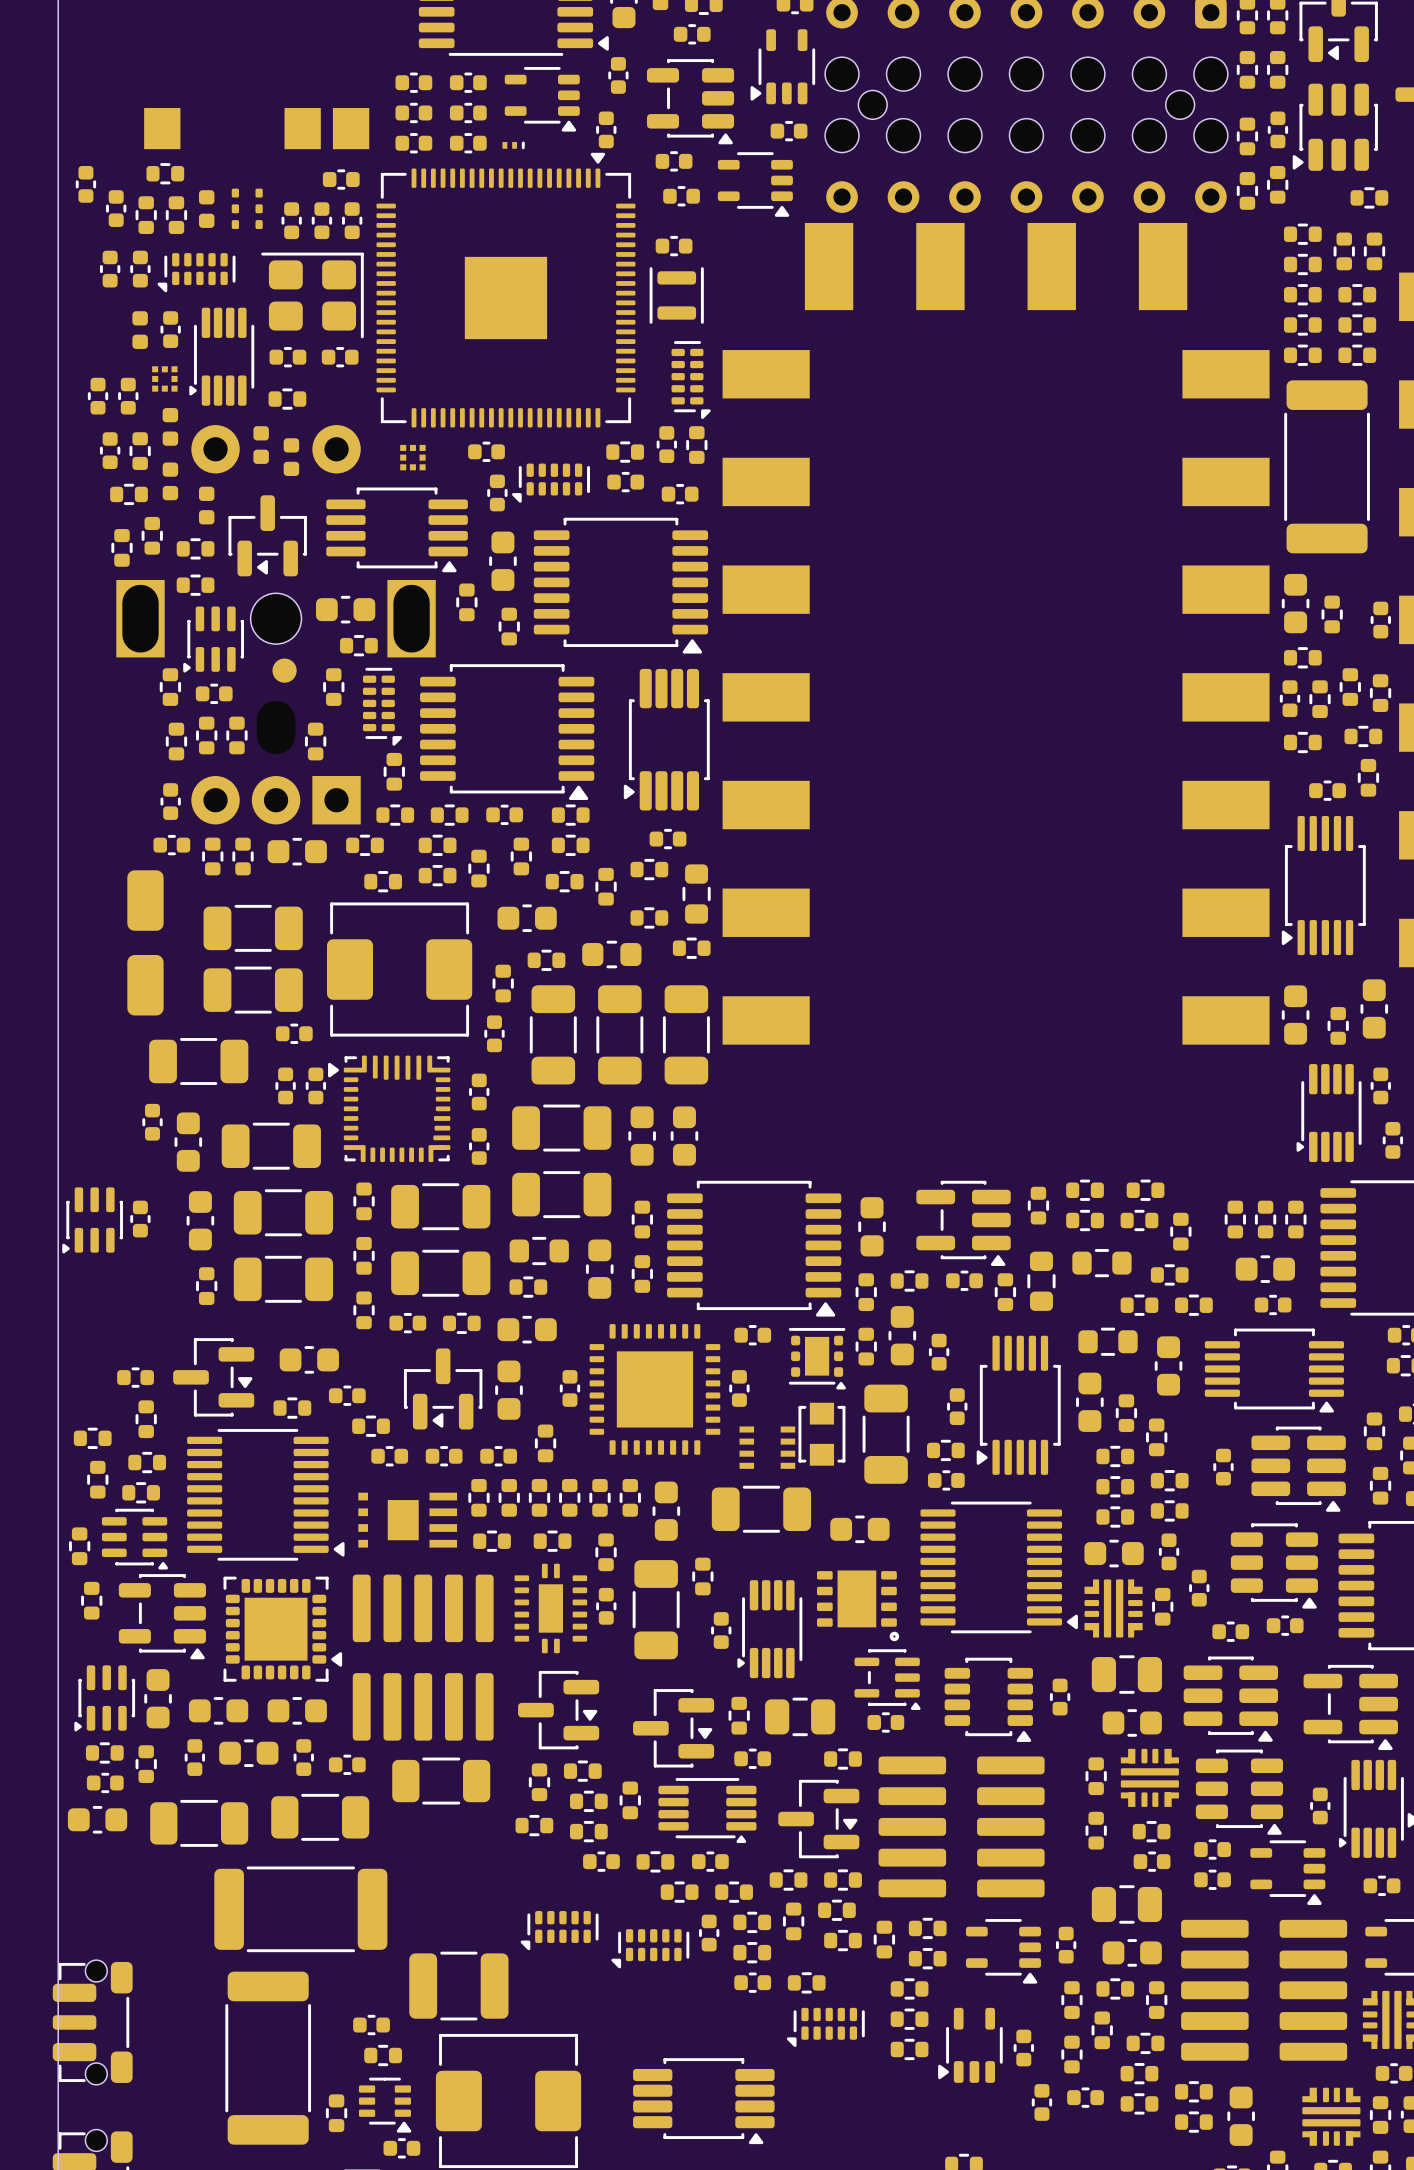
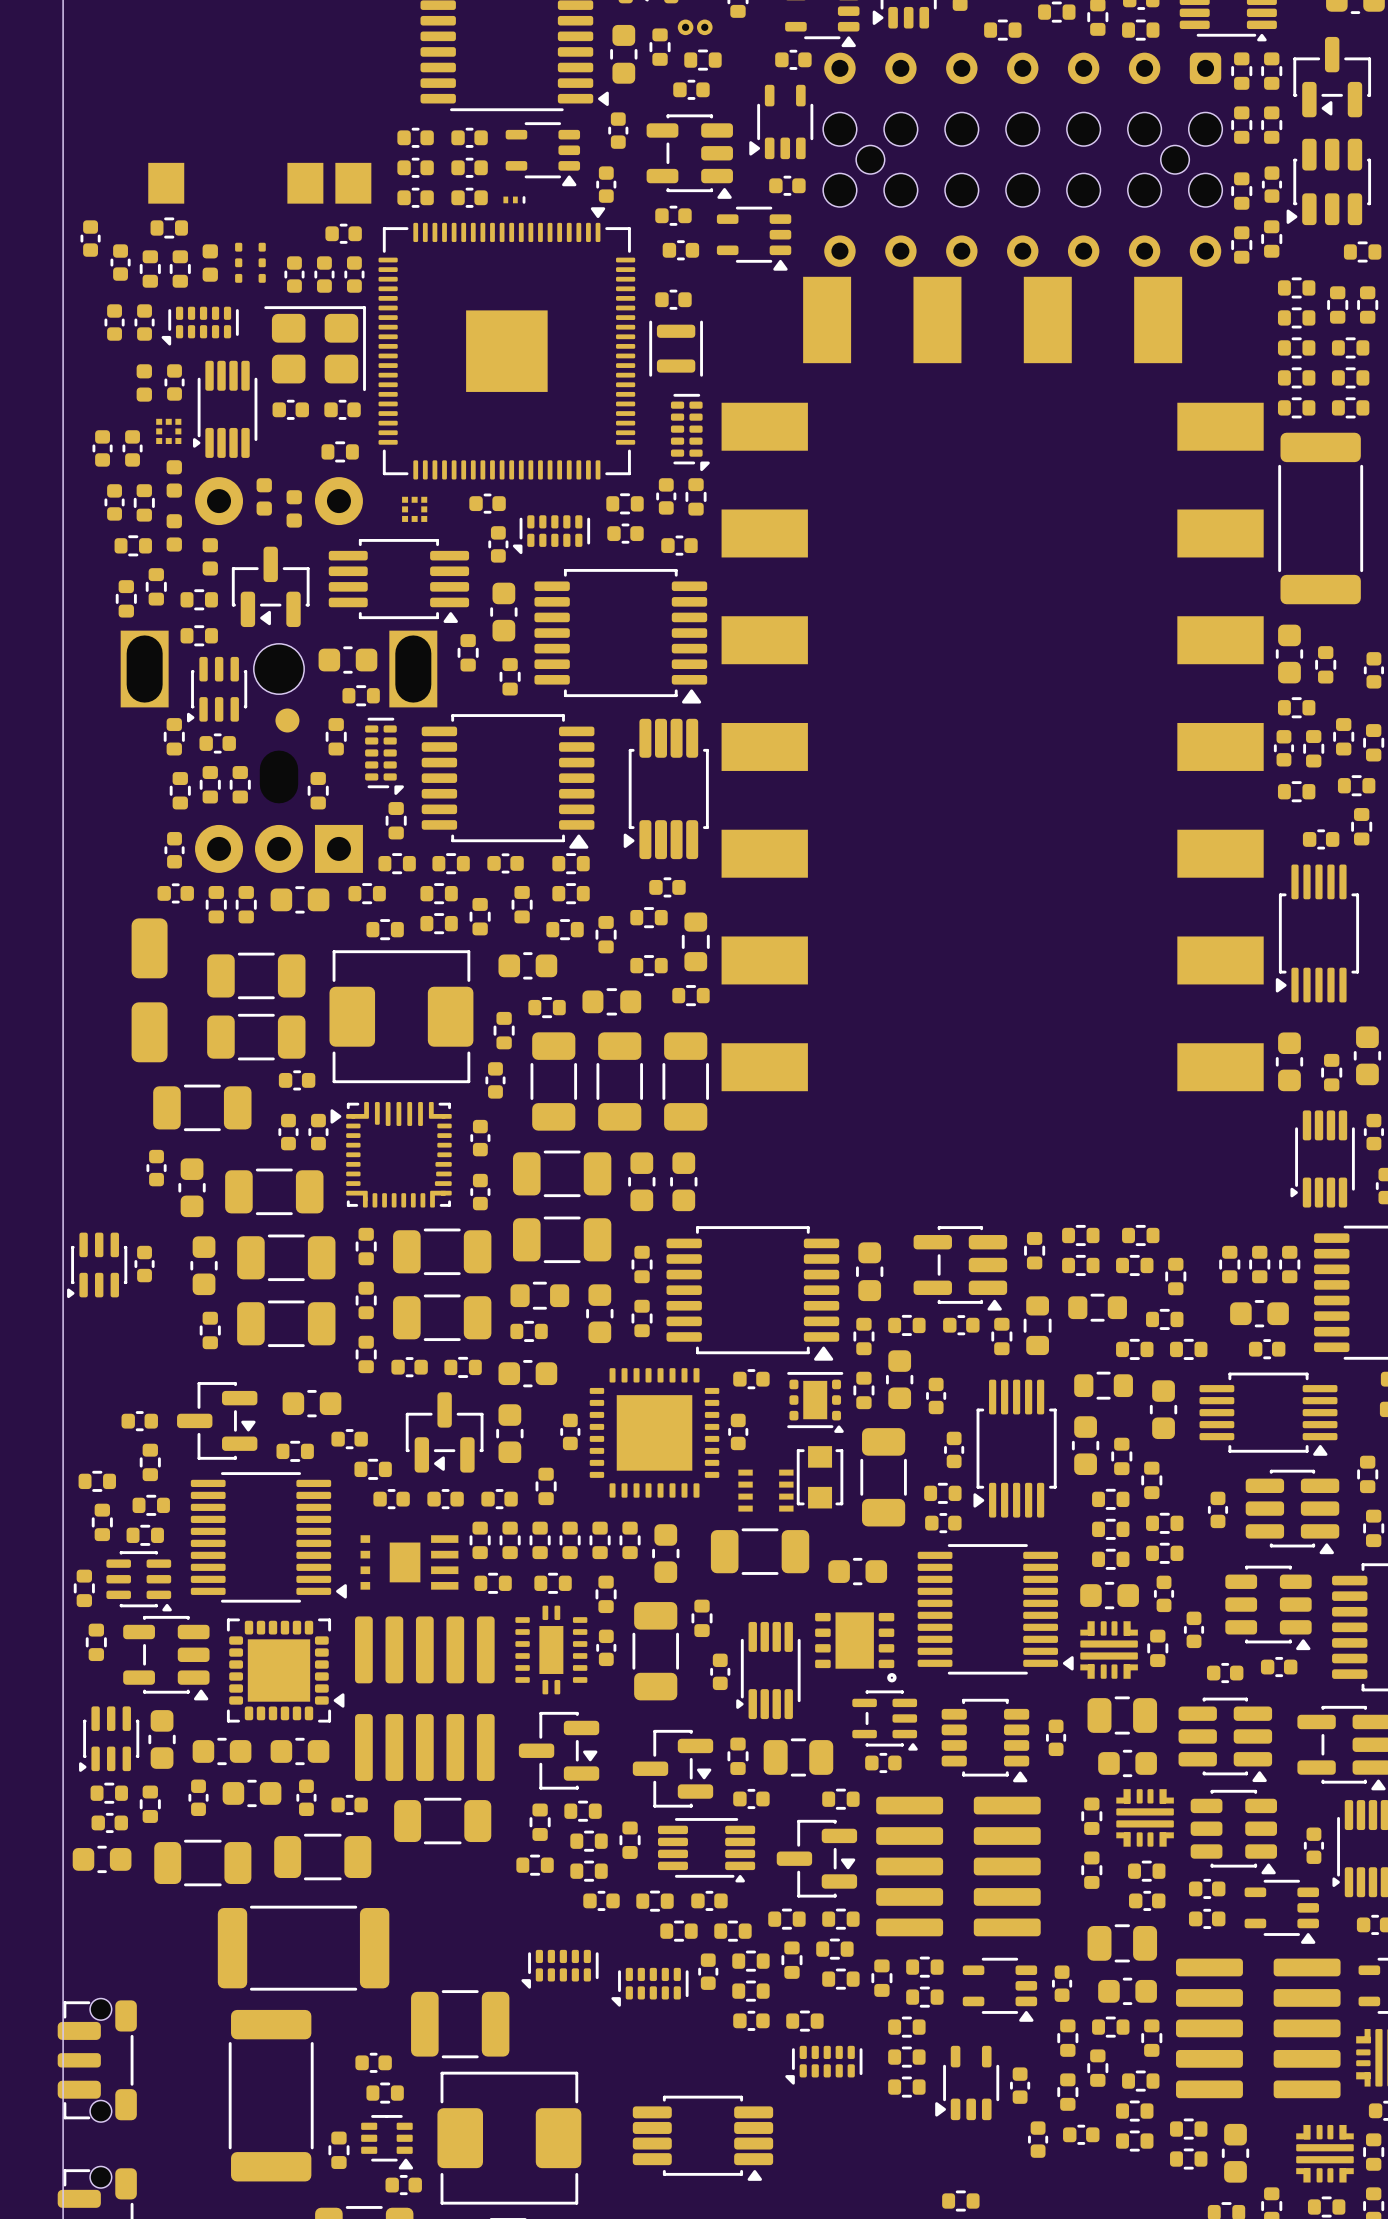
part position: (287, 399) -> (340, 451)
part rotation: 0° (1113, 1608) -> 90° clockwise (1109, 1650)

